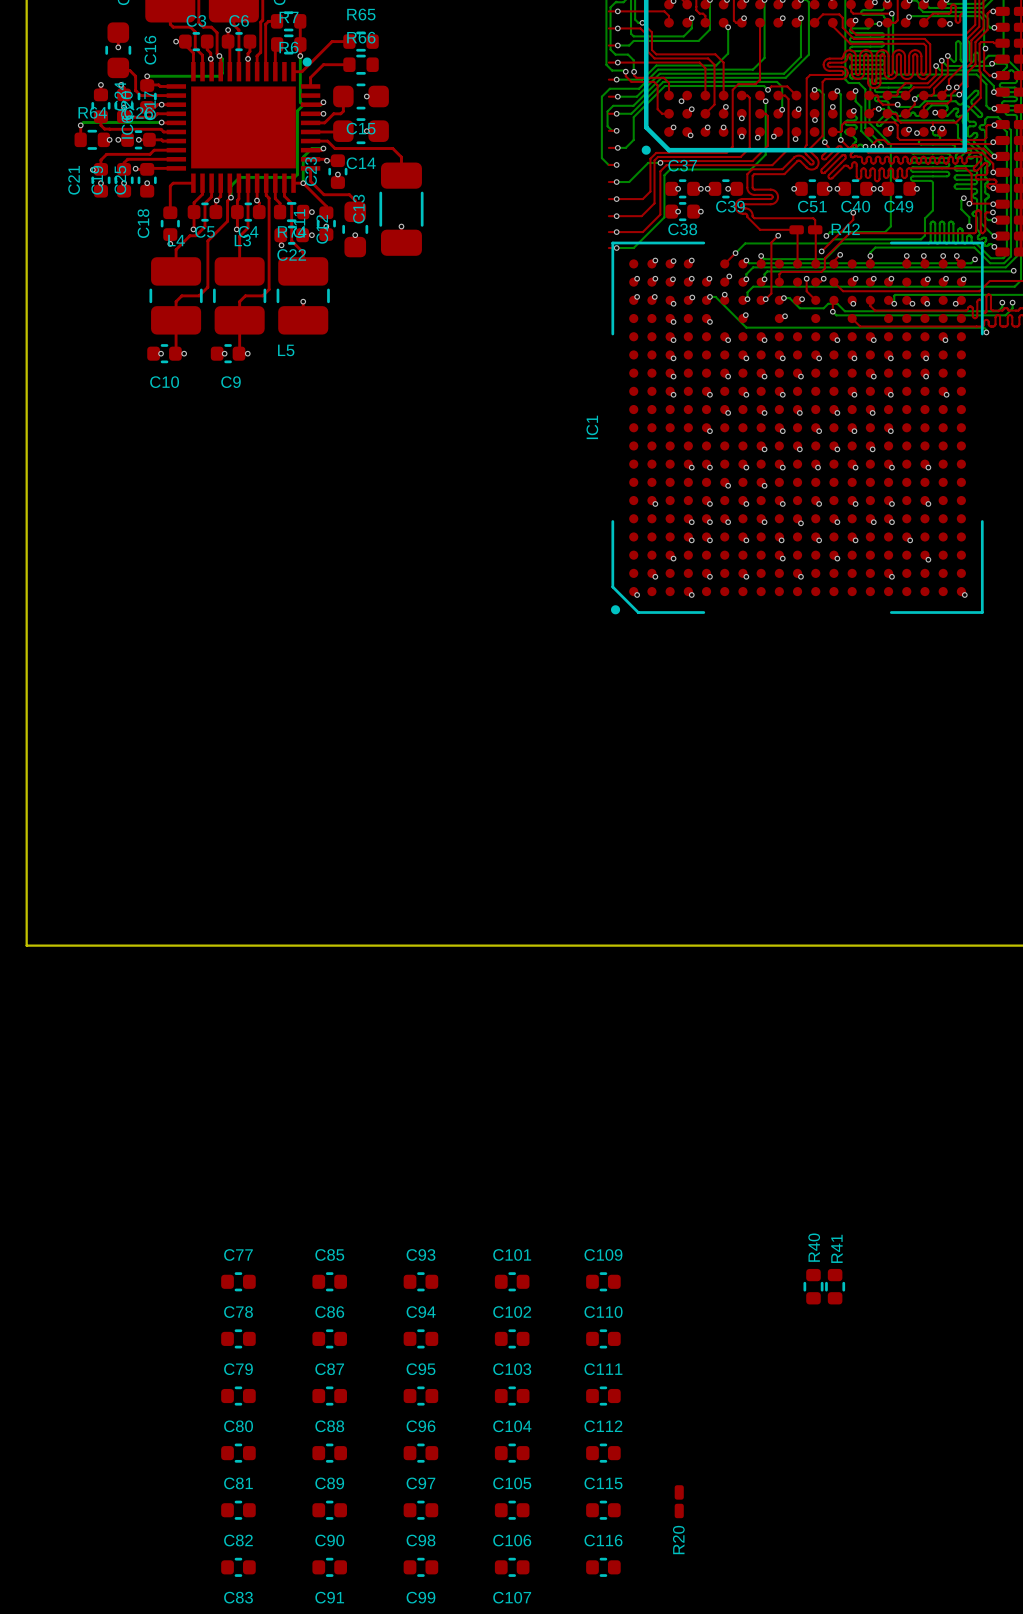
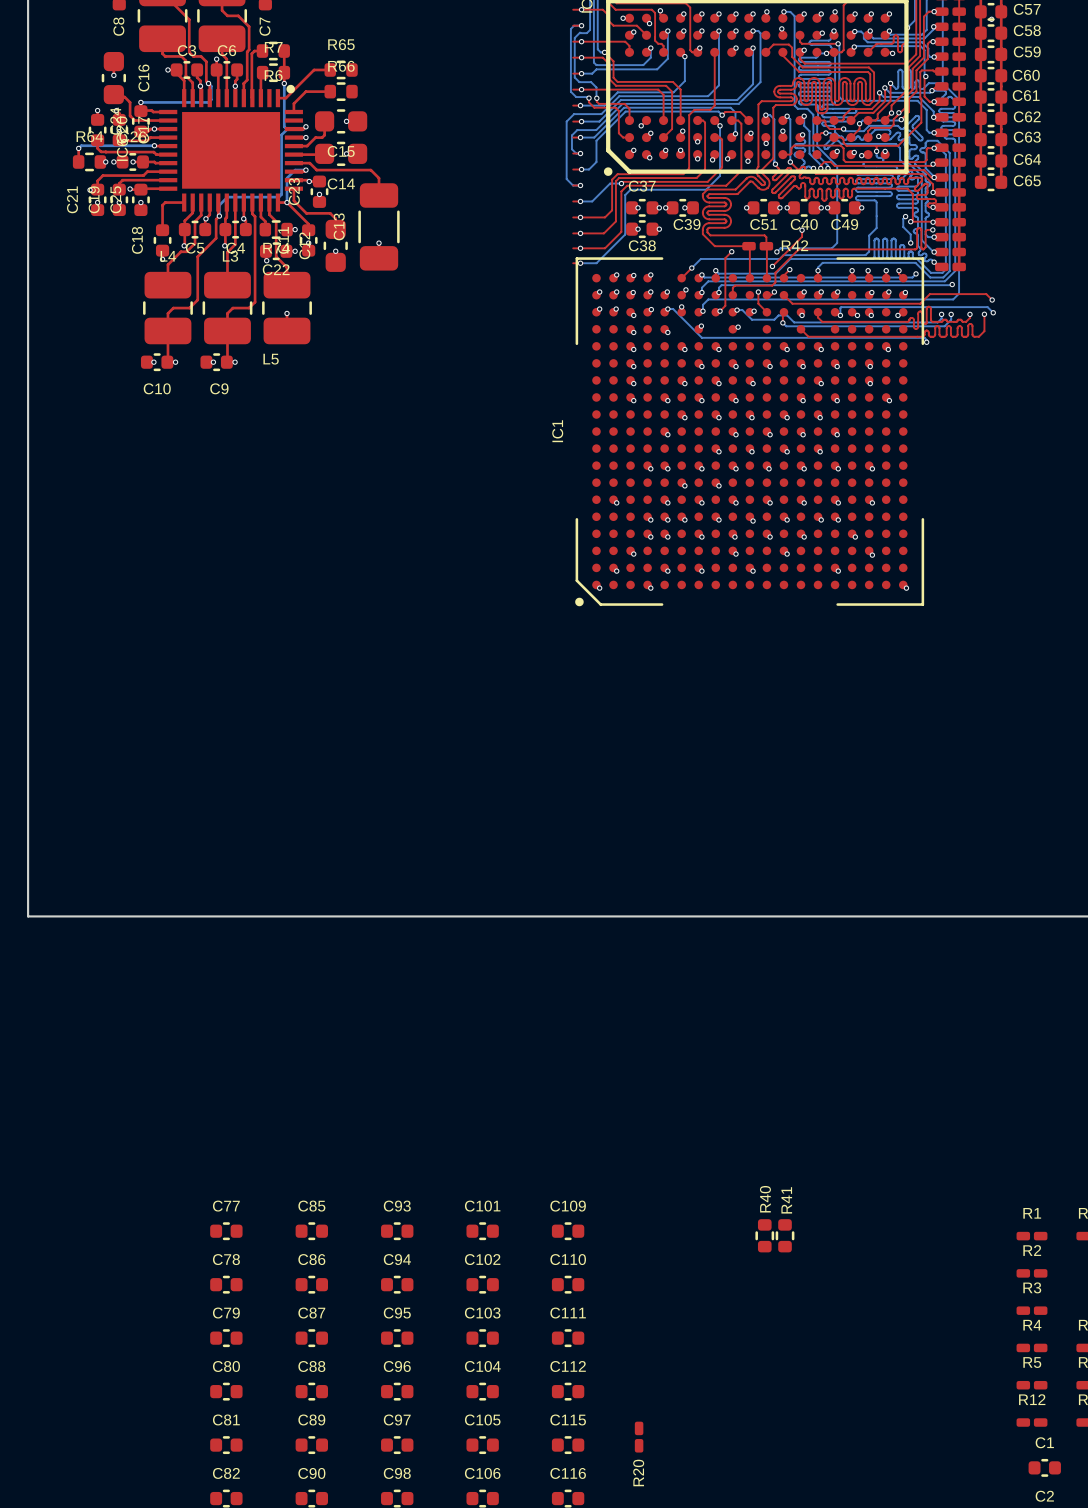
top track: (752, 175) (753, 189) (773, 190) (777, 193) (777, 199) (772, 204) (742, 204) (740, 206) -> (707, 195) (709, 197) (726, 198) (730, 203) (726, 210) (707, 211) (708, 214) (726, 215) (730, 220) (726, 227) (708, 228) (707, 232) (710, 235)
top track: (747, 176) (747, 188) (750, 193) (771, 194) (772, 197) (741, 199) (737, 201) (735, 206) -> (702, 196) (707, 202) (724, 202) (726, 204) (724, 206) (708, 206) (704, 208) (703, 214) (705, 218) (724, 219) (726, 221) (706, 223) (703, 227) (702, 232)
top track: (735, 206) (738, 212) (747, 215) -> none
top track: (740, 206) (749, 209) (755, 218) -> none

